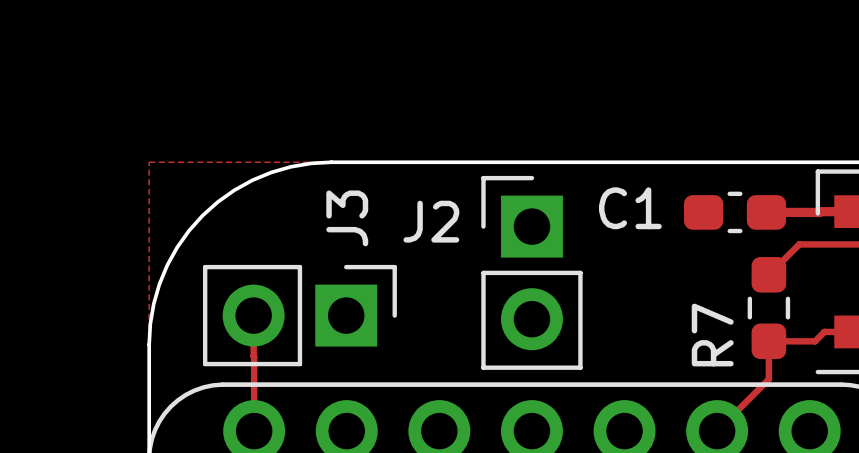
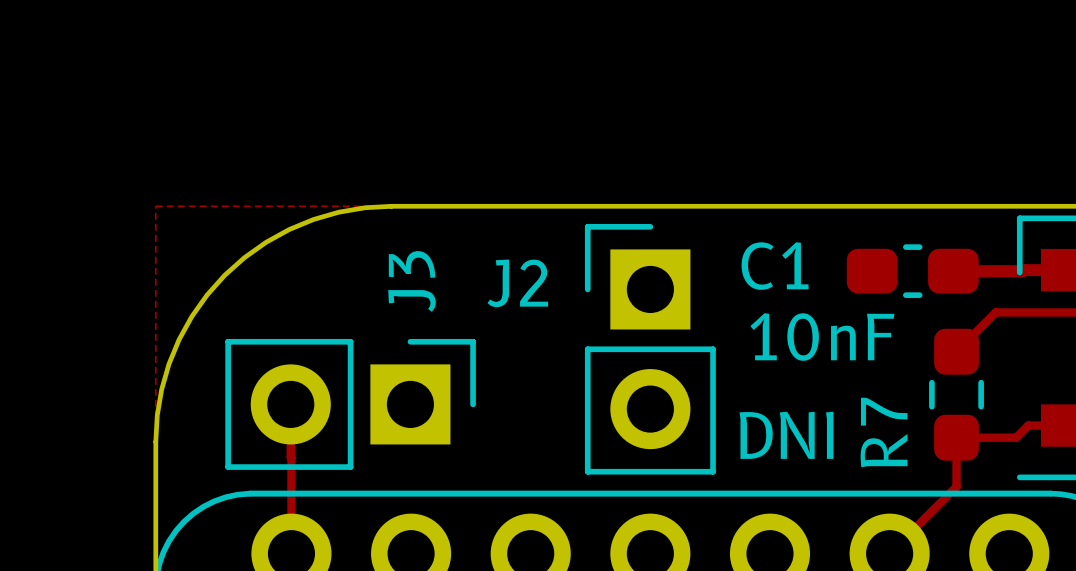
C1 value: none -> 10nF (822, 336)
R7 value: none -> DNI (786, 435)

